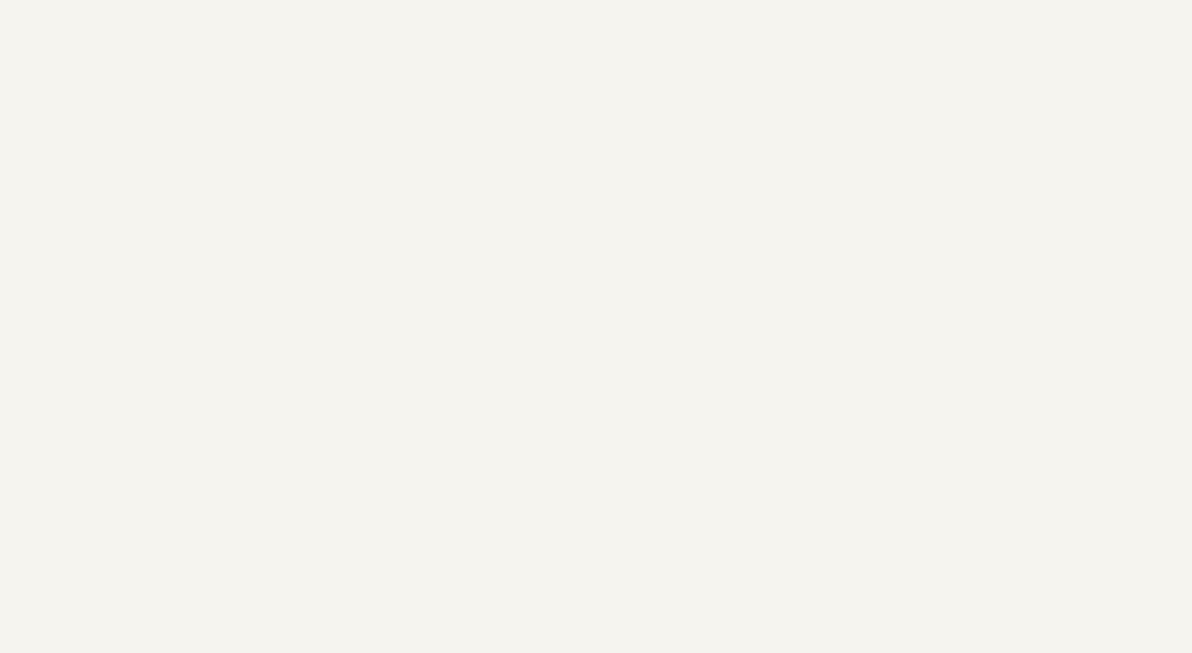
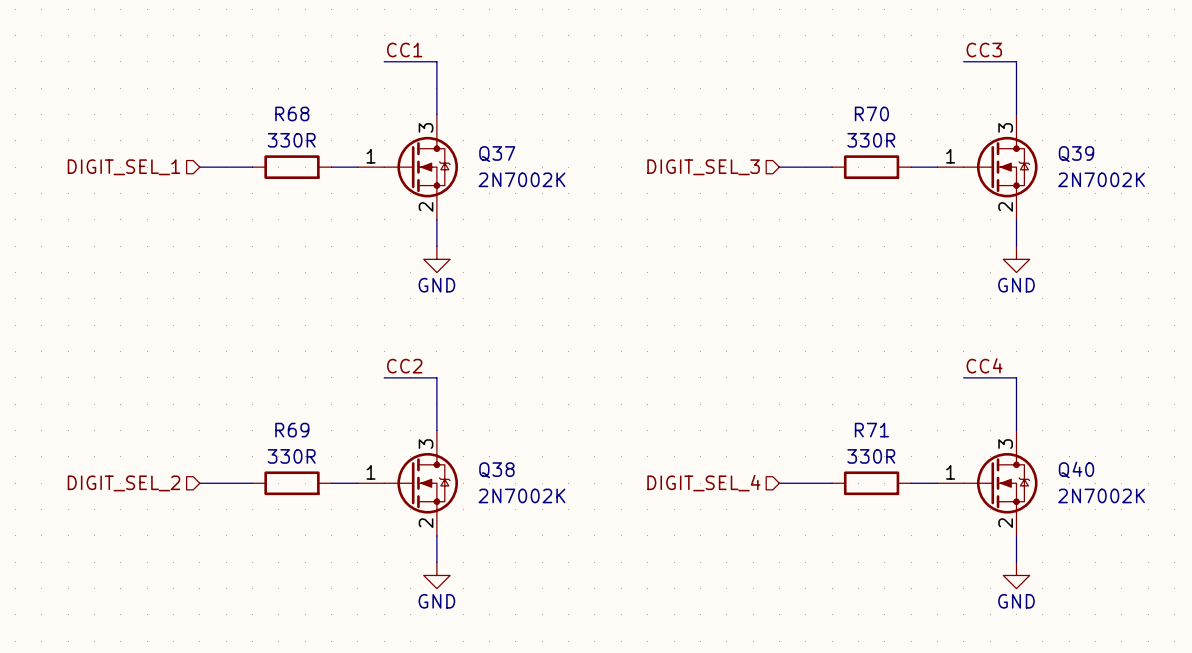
label: none -> CC1 (404, 50)
label: none -> CC3 (984, 50)
wire: none -> (384, 61) (436, 61) (436, 114)
wire: none -> (963, 61) (1016, 61) (1016, 114)
wire: none -> (199, 167) (252, 167)
R68: none -> 330R (292, 167)
wire: none -> (331, 167) (357, 167)
Q37: none -> 2N7002K (407, 167)
wire: none -> (779, 167) (832, 167)
R70: none -> 330R (871, 167)
wire: none -> (911, 167) (937, 167)
Q39: none -> 2N7002K (987, 167)
hierarchical label: none -> DIGIT_SEL_1 (124, 167)
hierarchical label: none -> DIGIT_SEL_3 (703, 167)
wire: none -> (436, 219) (436, 246)
wire: none -> (1016, 219) (1016, 246)
power symbol: none -> GND (436, 259)
power symbol: none -> GND (1016, 259)
label: none -> CC2 (404, 366)
label: none -> CC4 (984, 365)
wire: none -> (384, 377) (436, 377) (436, 430)
wire: none -> (963, 377) (1016, 377) (1016, 430)
wire: none -> (199, 483) (252, 483)
R69: none -> 330R (292, 483)
wire: none -> (331, 483) (357, 483)
Q38: none -> 2N7002K (407, 483)
wire: none -> (779, 483) (832, 483)
R71: none -> 330R (871, 483)
wire: none -> (911, 483) (937, 483)
Q40: none -> 2N7002K (987, 483)
hierarchical label: none -> DIGIT_SEL_2 (124, 483)
hierarchical label: none -> DIGIT_SEL_4 (703, 483)
wire: none -> (436, 535) (436, 562)
wire: none -> (1016, 535) (1016, 562)
power symbol: none -> GND (436, 575)
power symbol: none -> GND (1016, 575)

